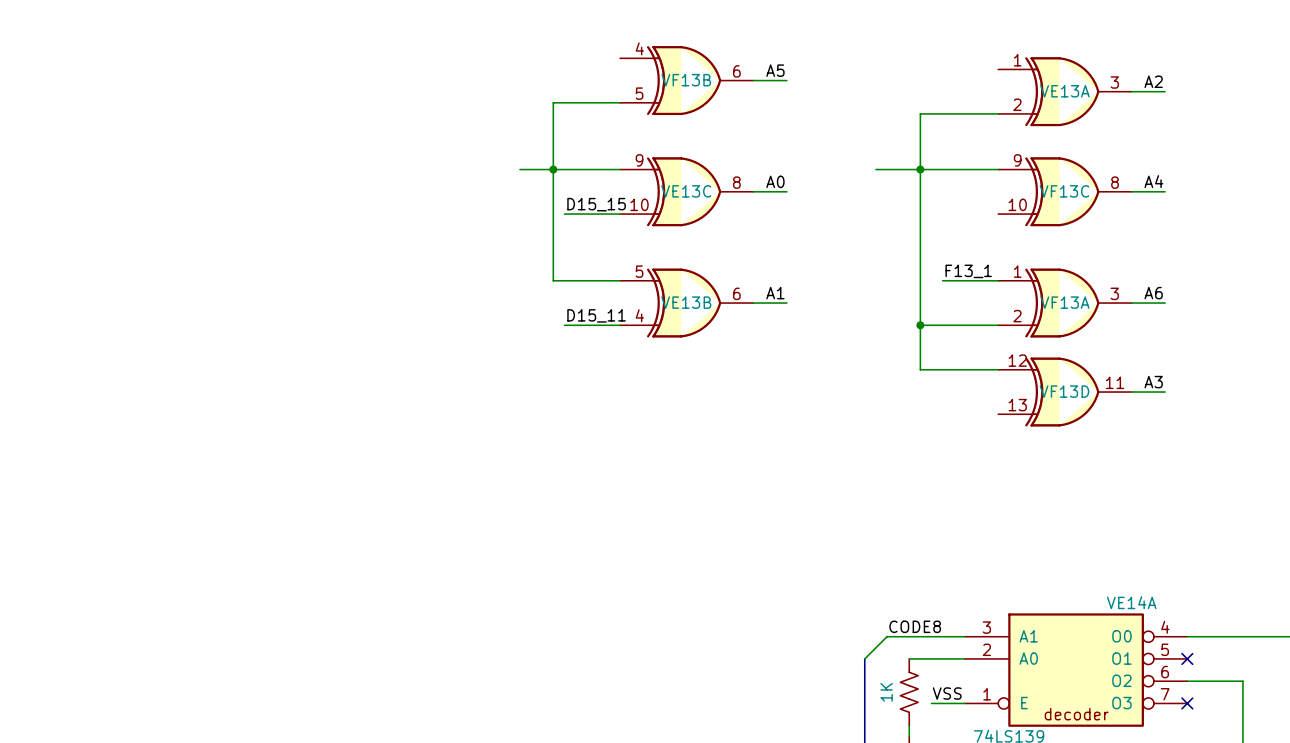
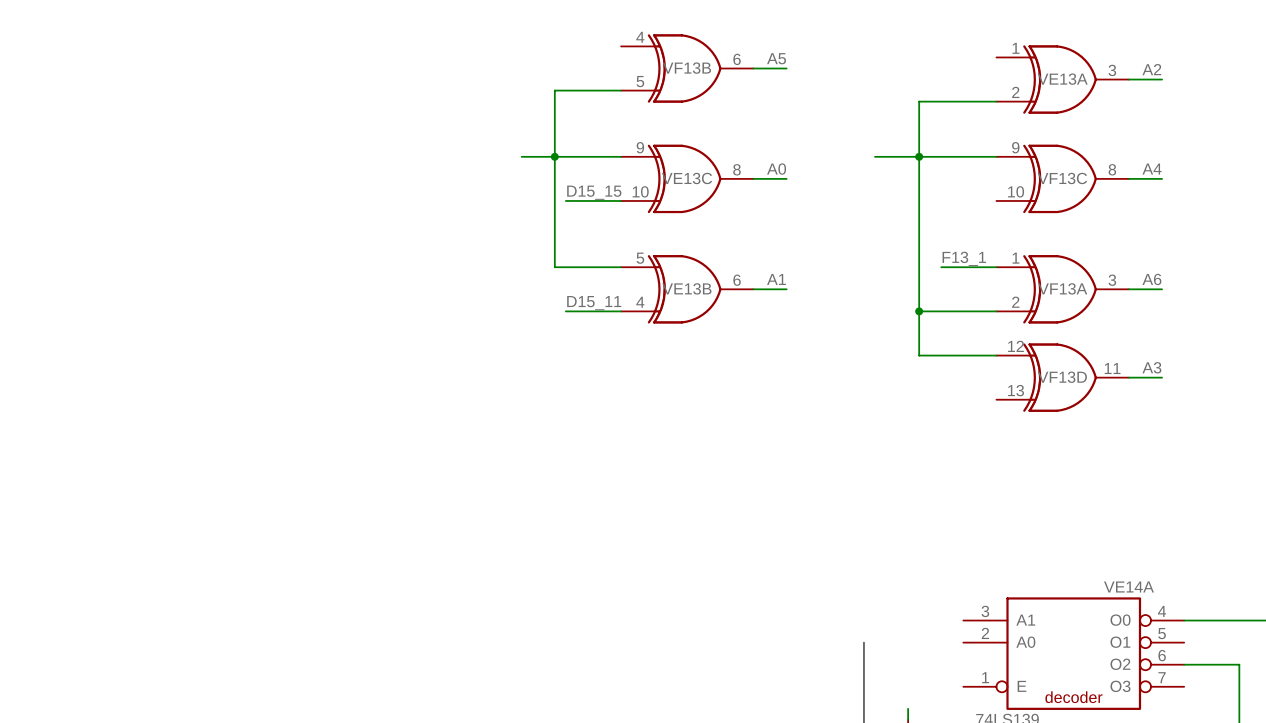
label: CODE8 (915, 626) -> none
wire: (964, 636) (887, 636) (864, 658) -> none
wire: (909, 658) (964, 658) -> none
no-connect mark: (1187, 658) -> none
part: 1K (909, 692) -> none
label: VSS (947, 693) -> none
wire: (931, 703) (964, 703) -> none
no-connect mark: (1187, 703) -> none

